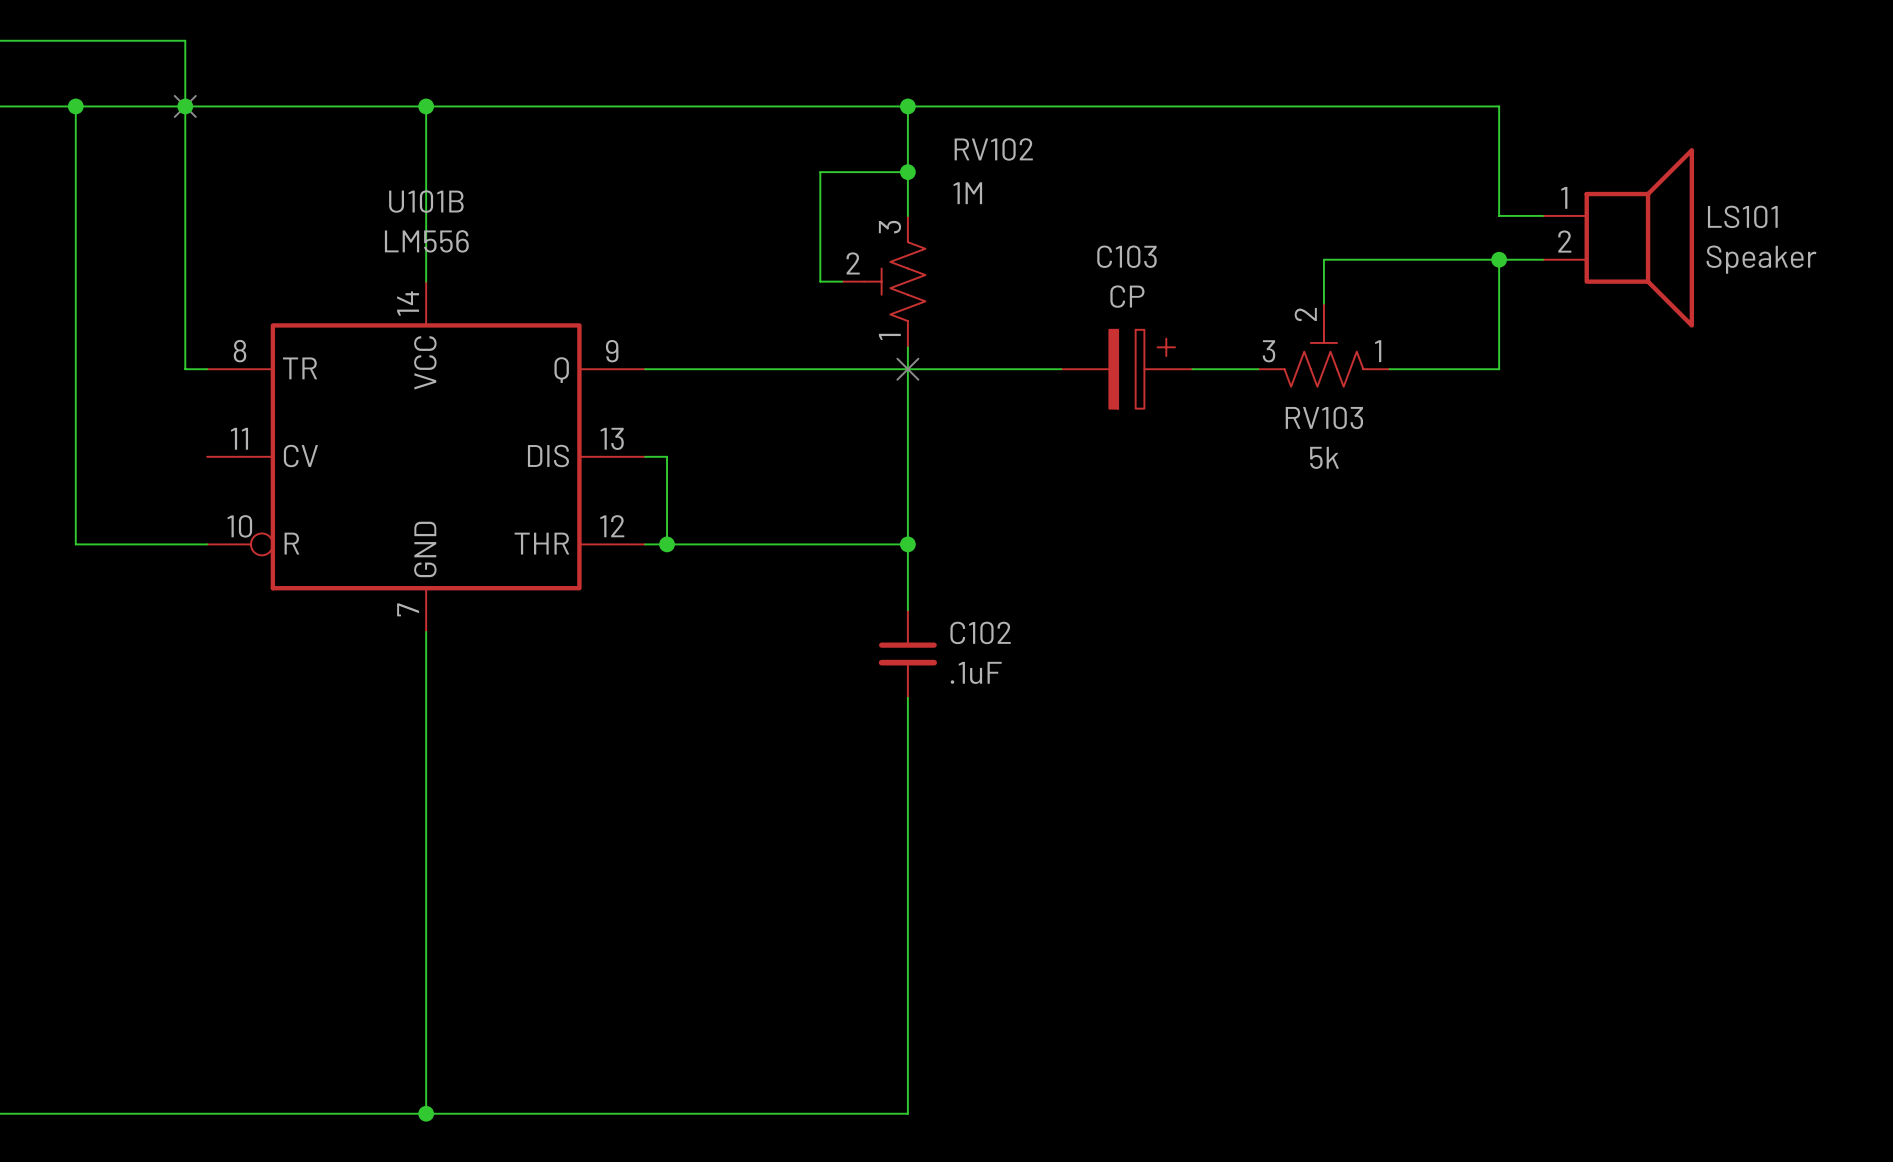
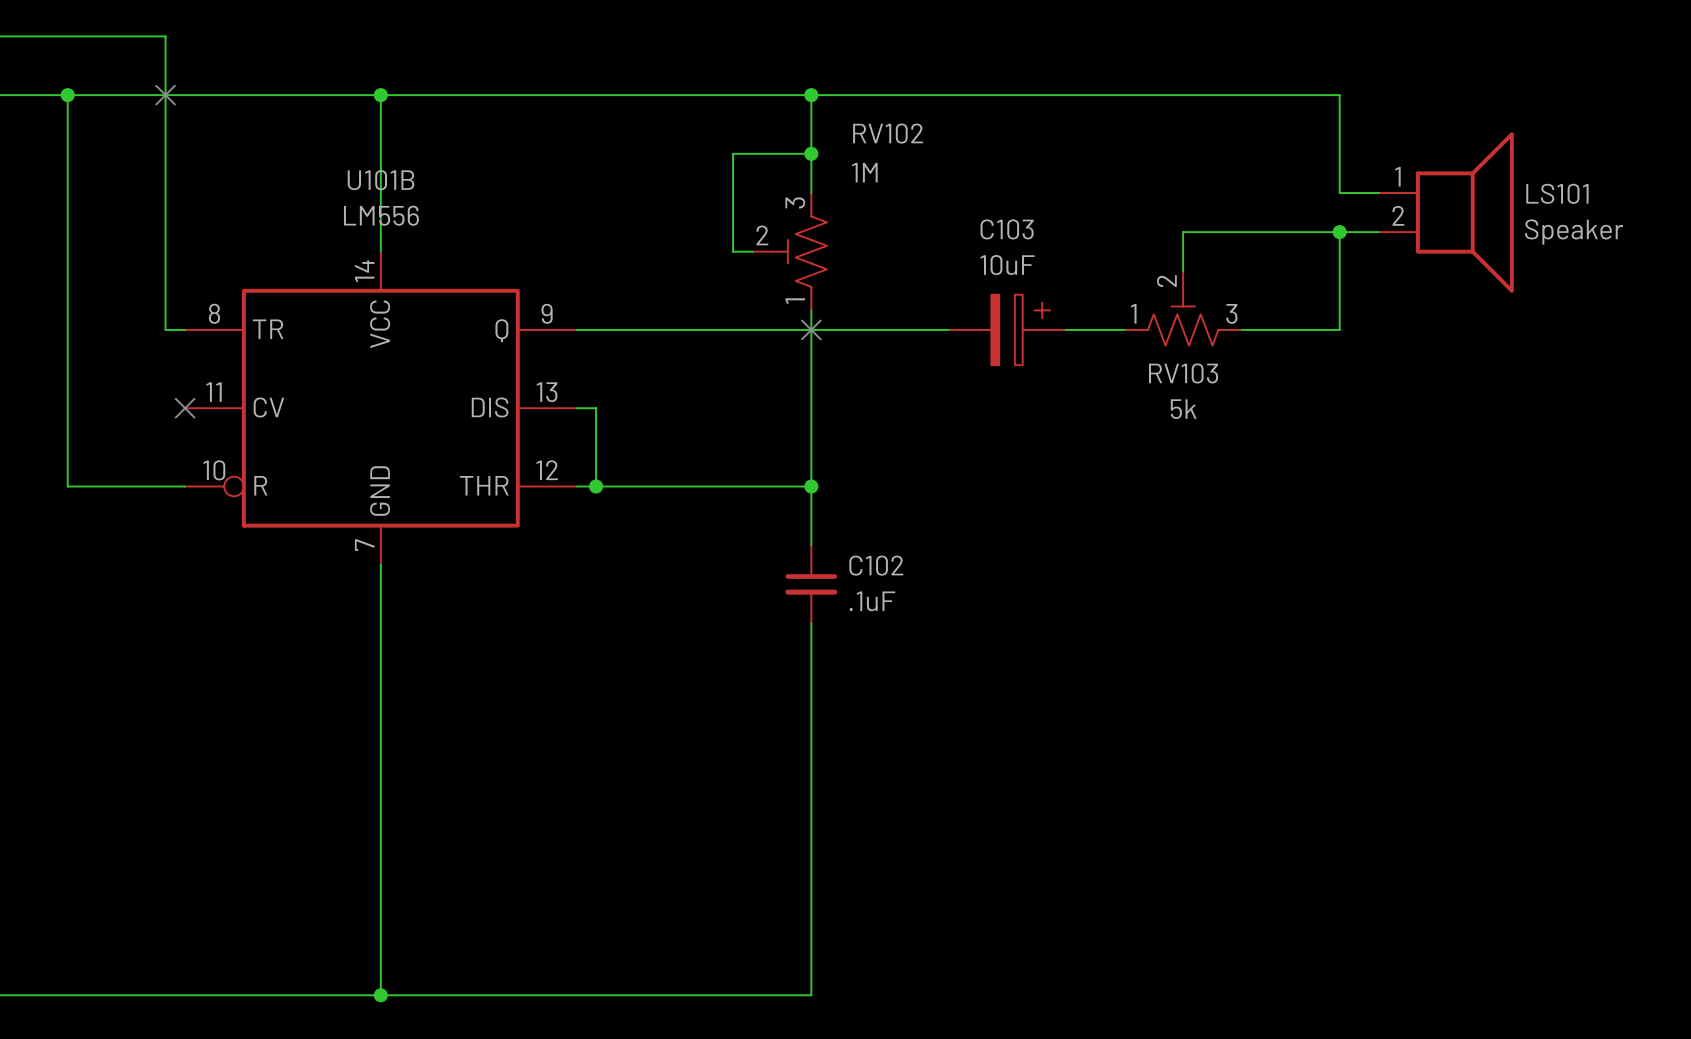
junction: (185, 106) -> none
C103 value: CP (1127, 296) -> 10uF (1007, 265)
RV103 flip: as is (1323, 356) -> left-right (1183, 318)
no-connect mark: none -> (185, 408)

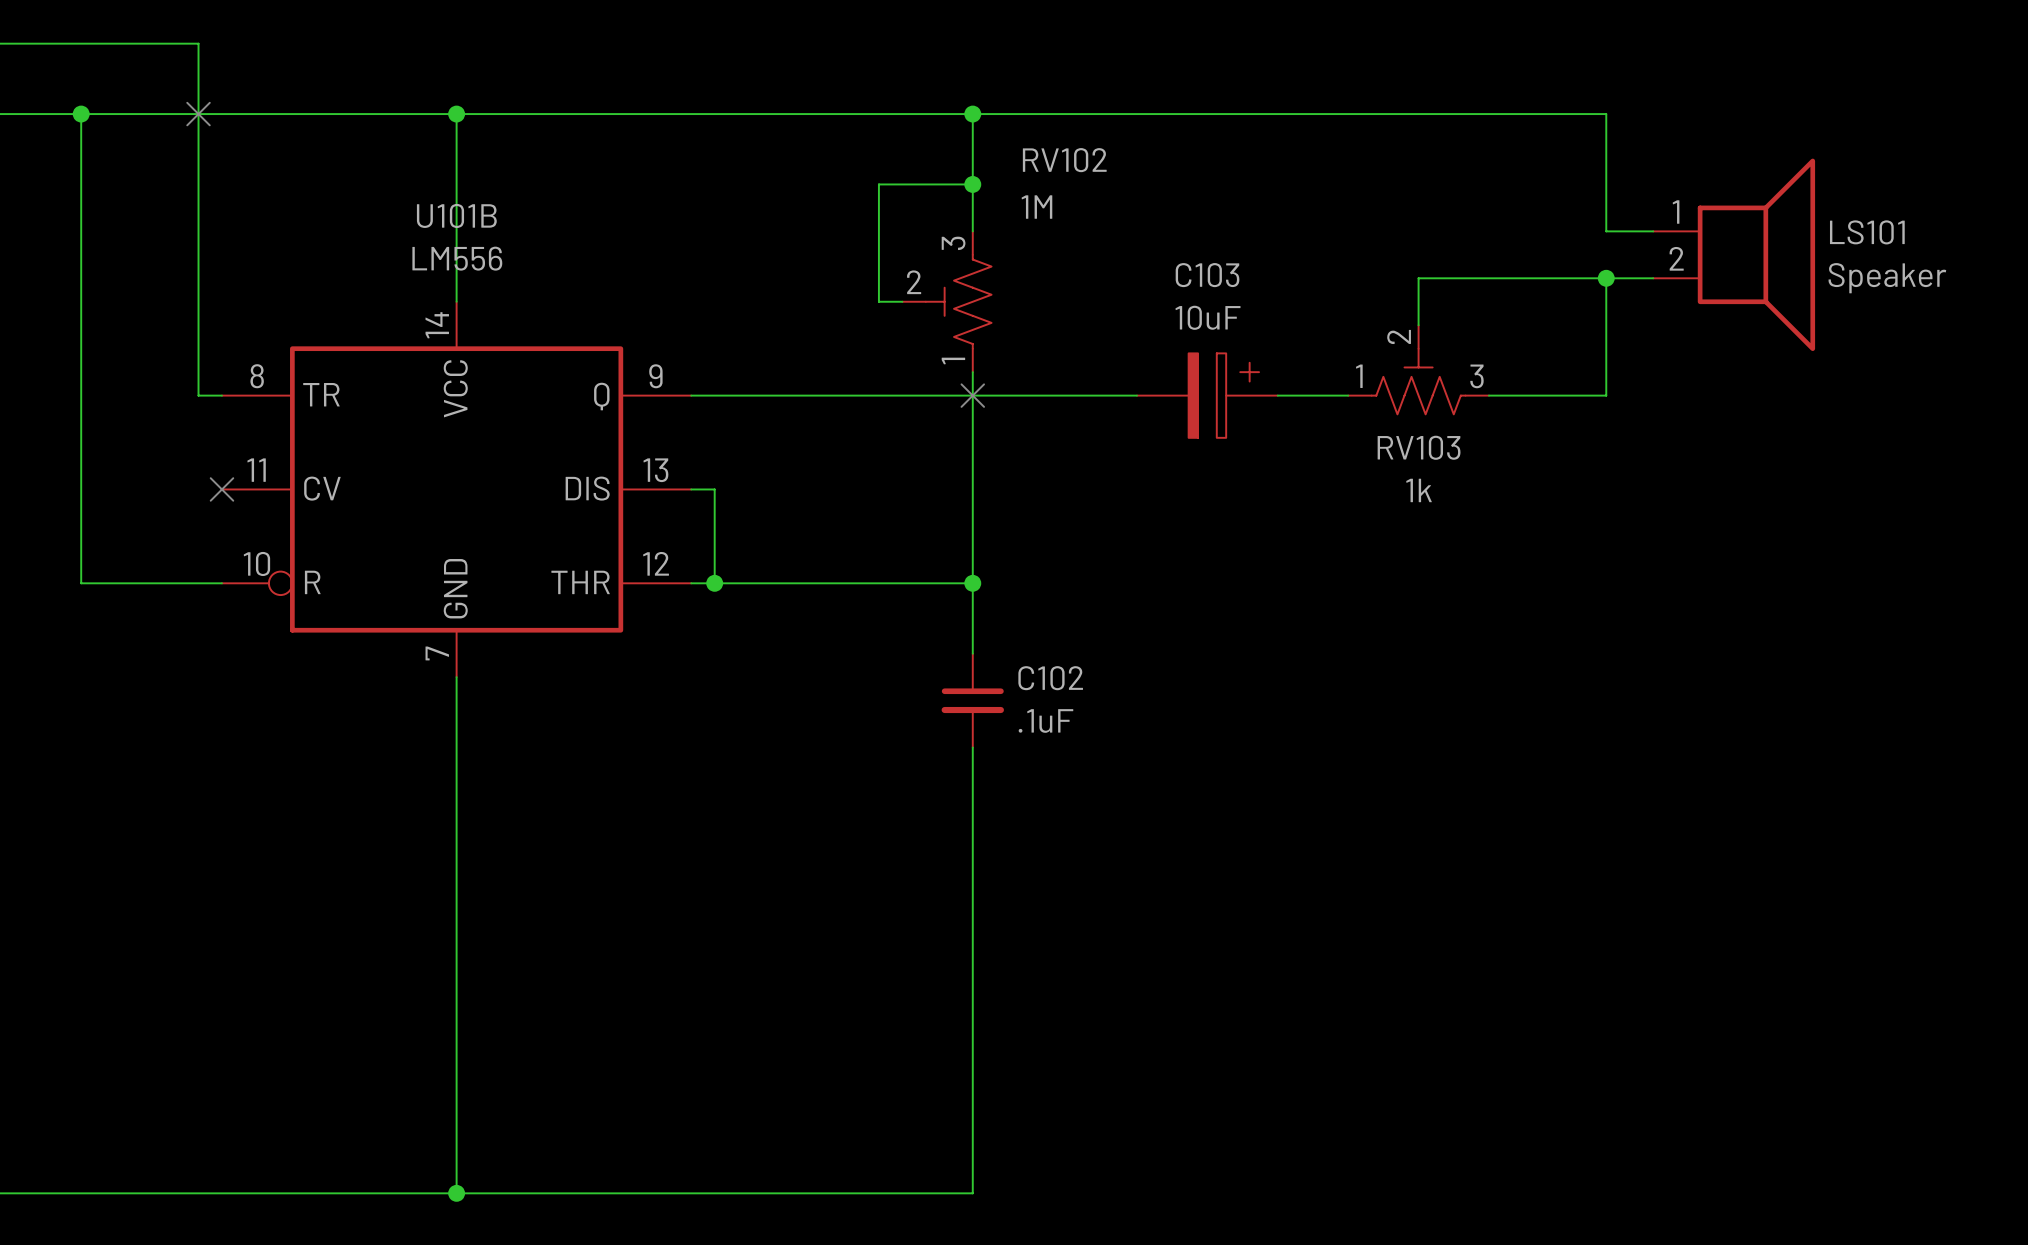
RV103 value: 5k (1183, 409) -> 1k (1419, 490)

